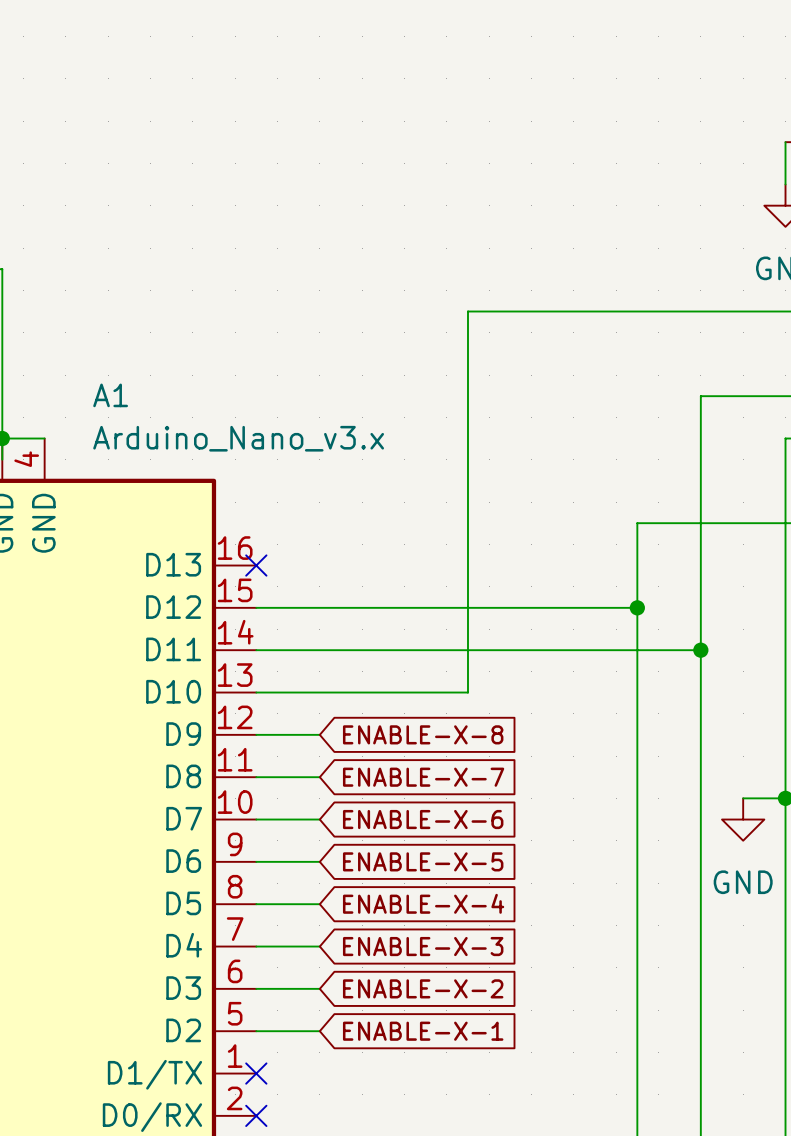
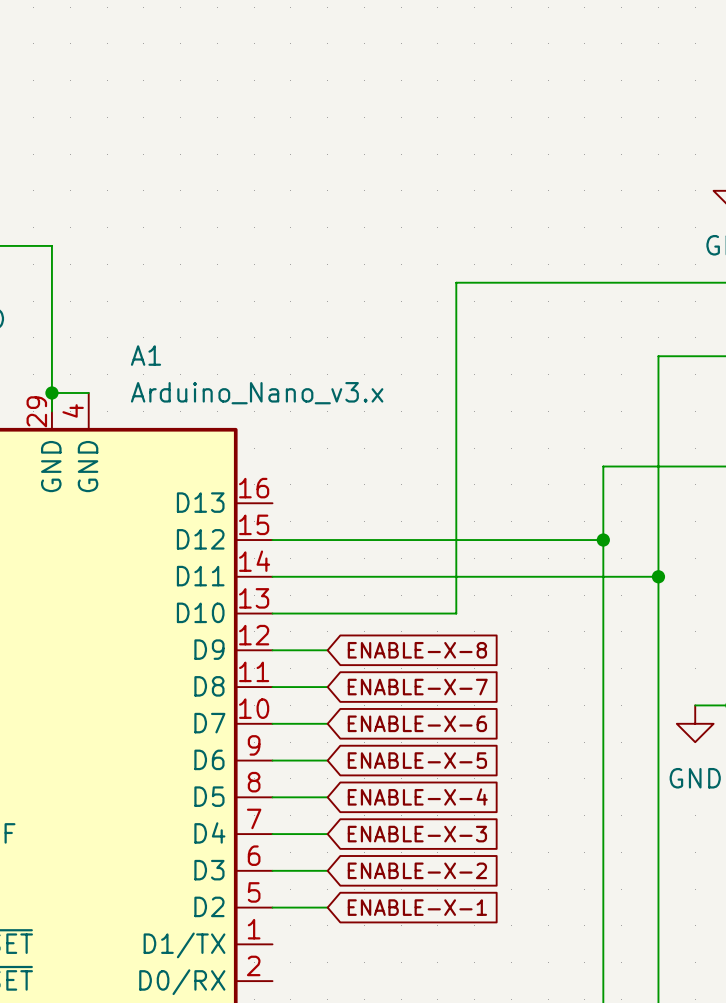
no-connect mark: (256, 565) -> none
no-connect mark: (256, 1073) -> none
no-connect mark: (256, 1115) -> none

